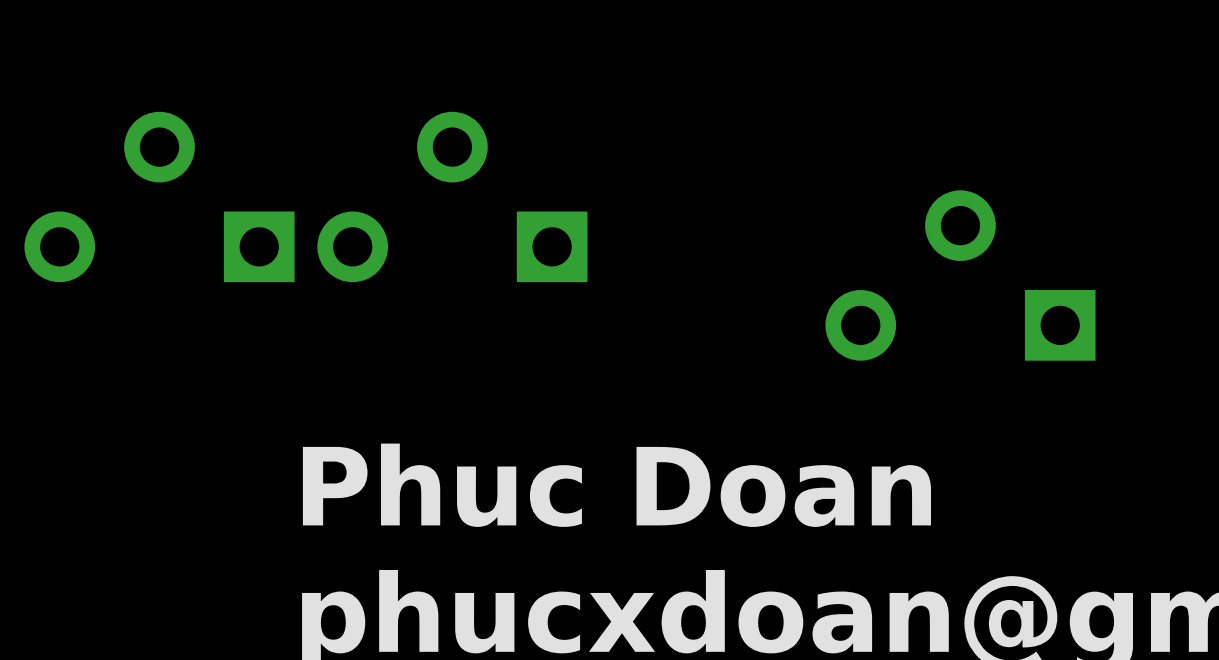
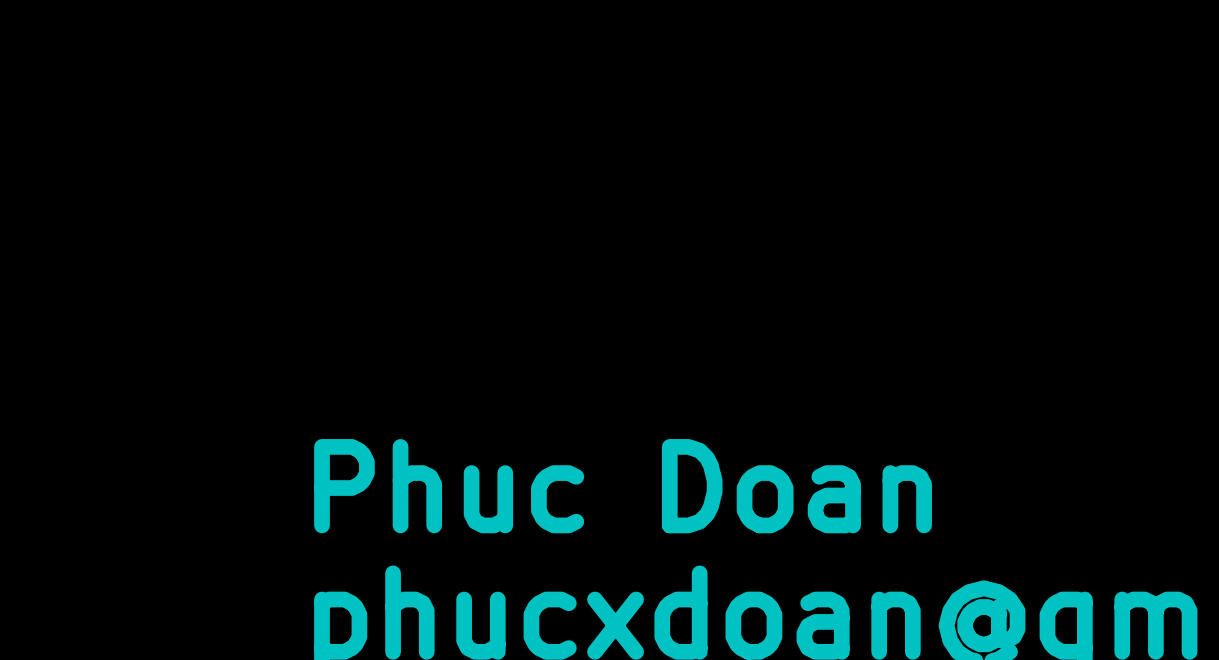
part: (159, 196) -> none
part: (452, 196) -> none
part: (960, 275) -> none

